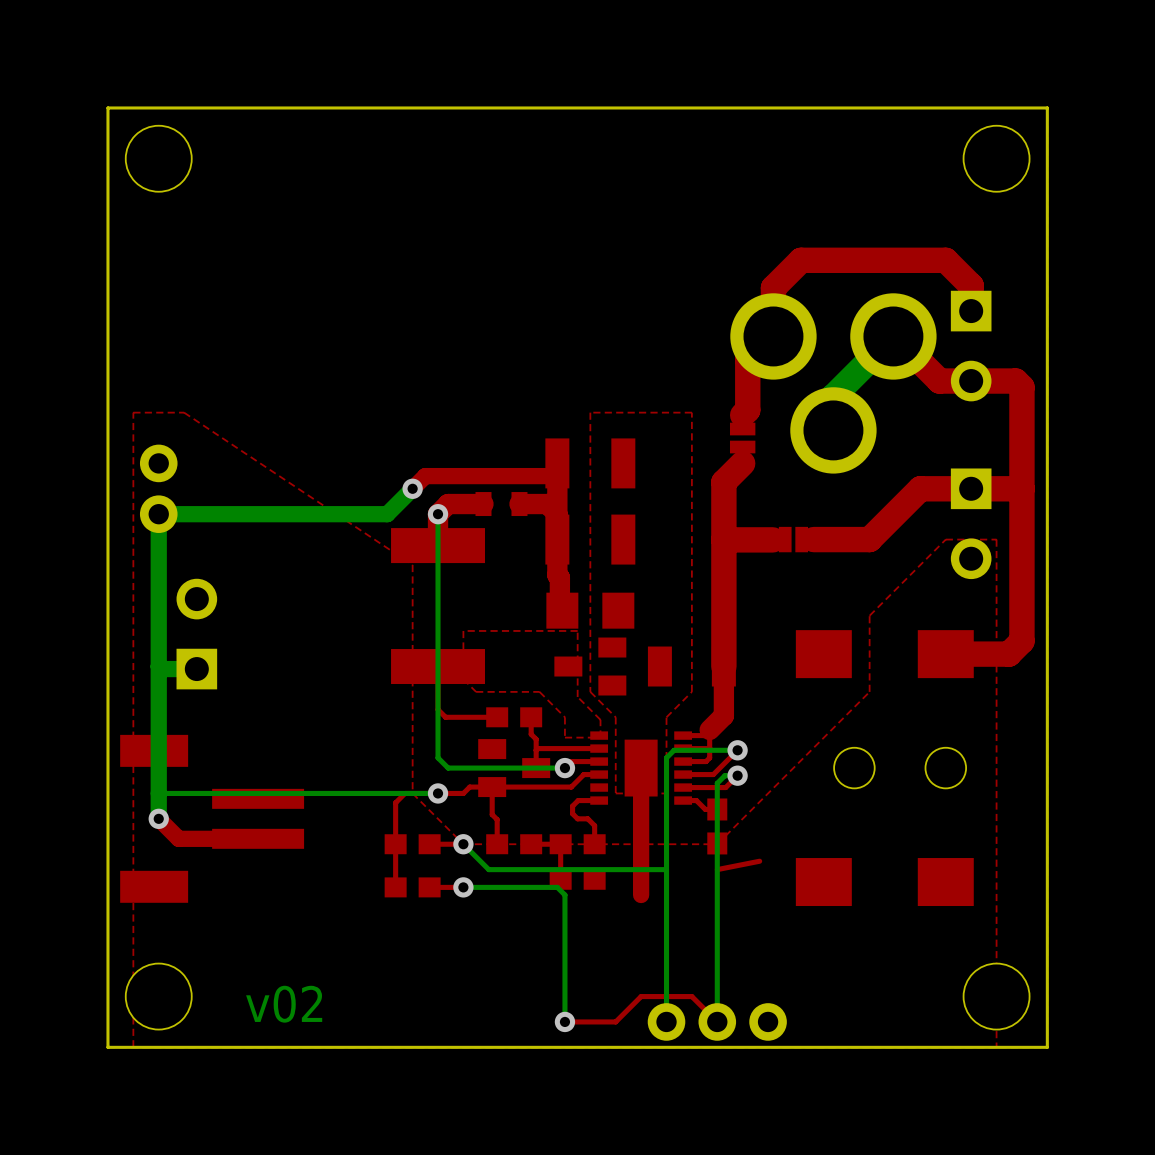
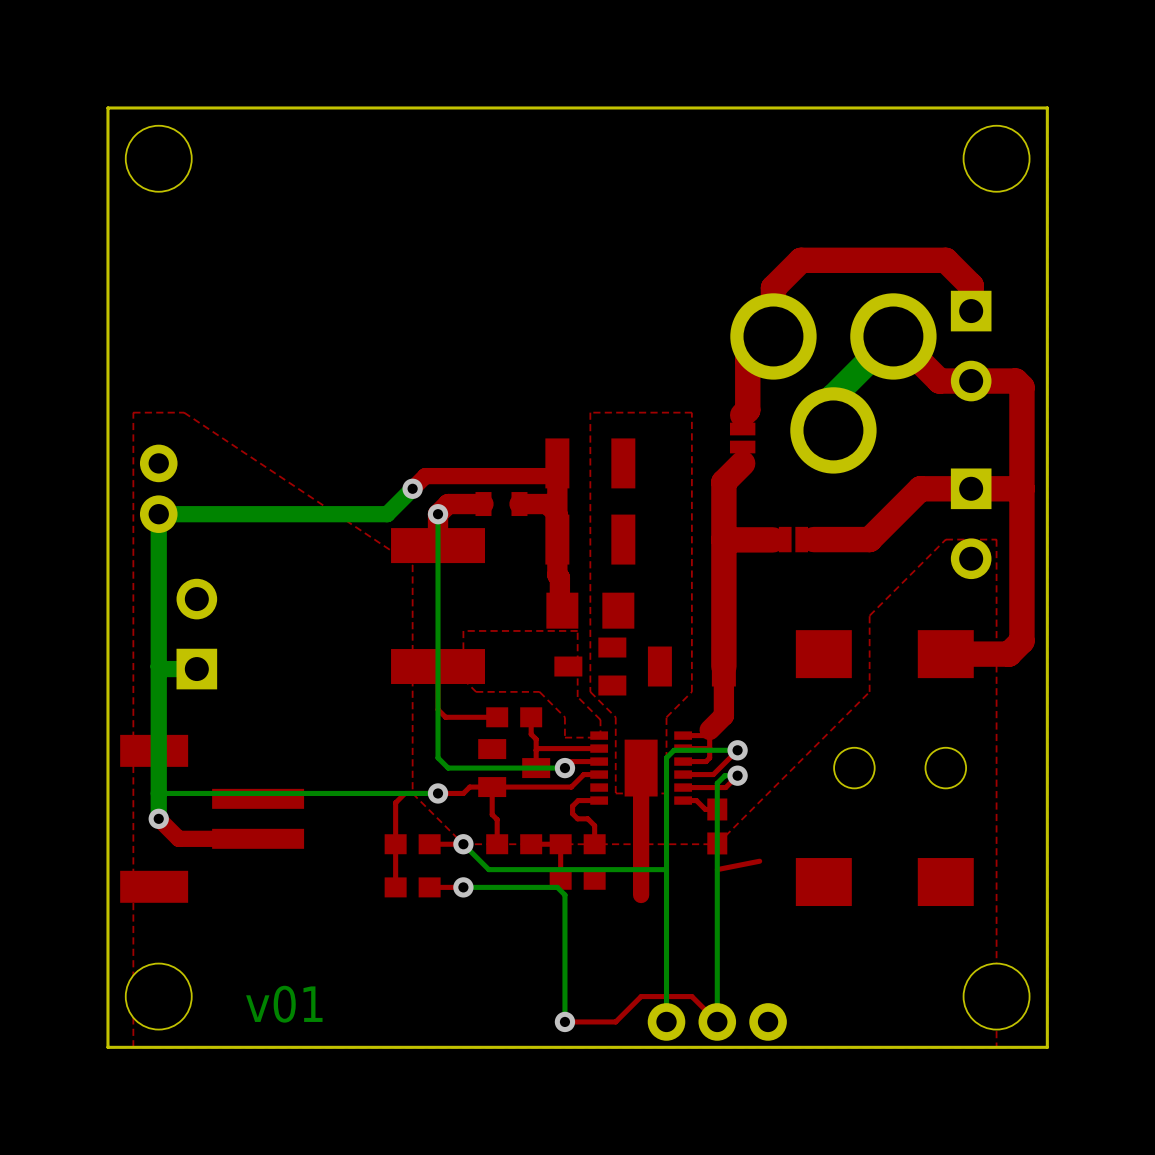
text: v02 (284, 1004) -> v01 (284, 1004)

